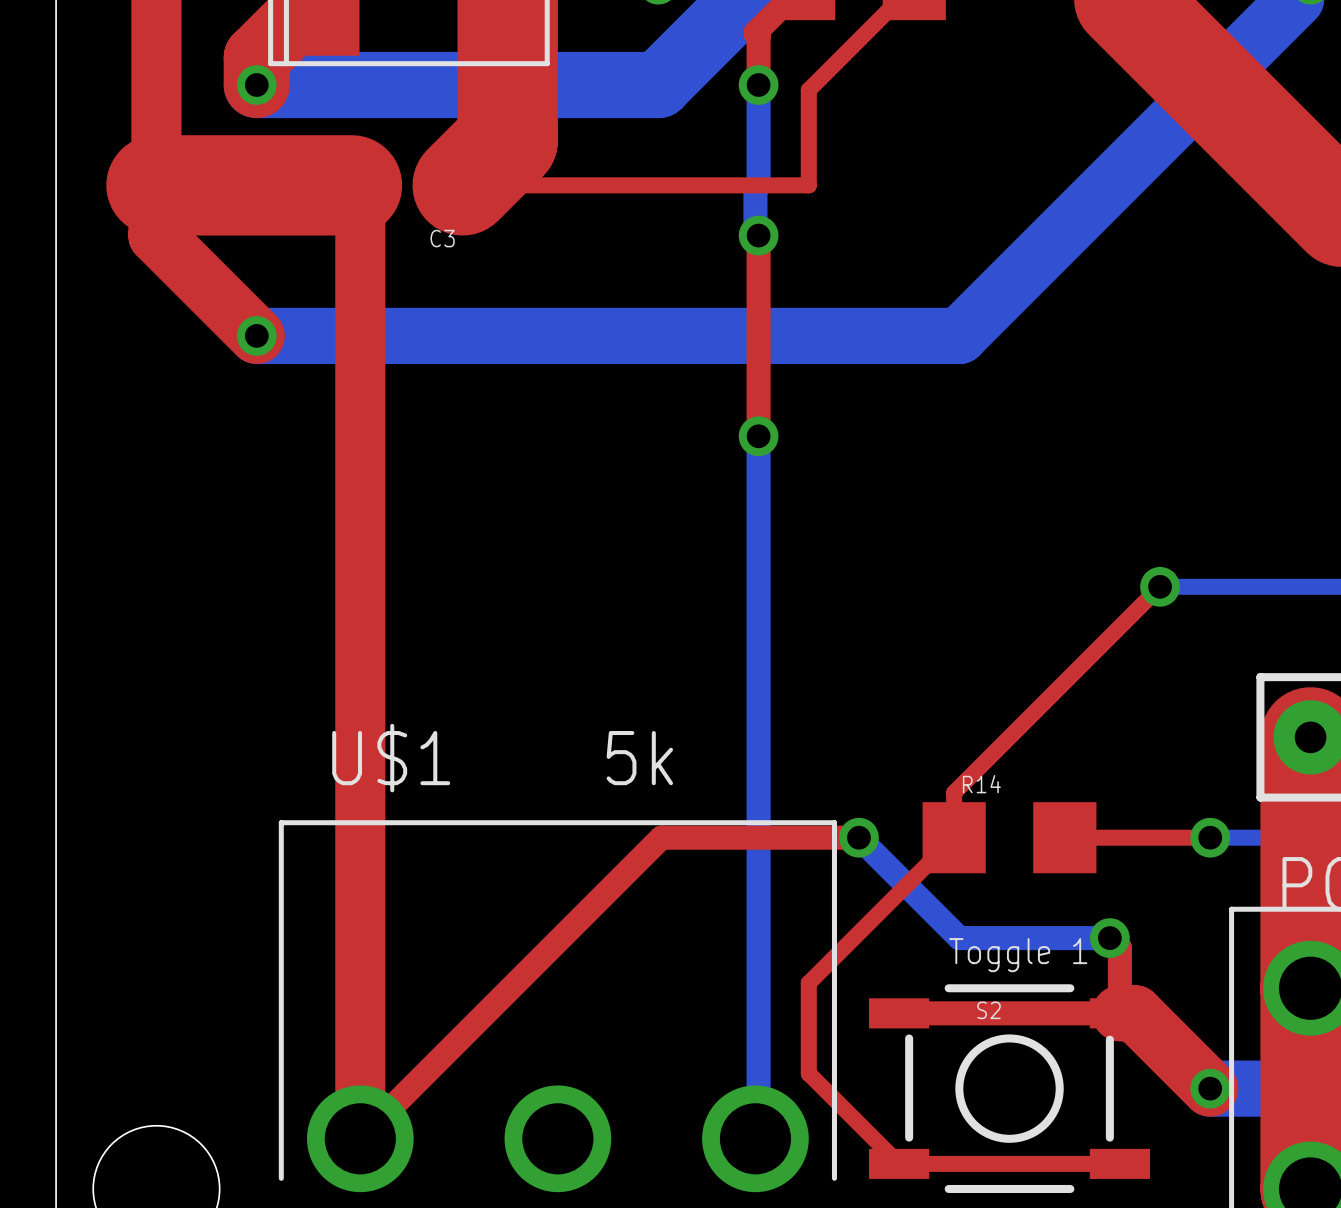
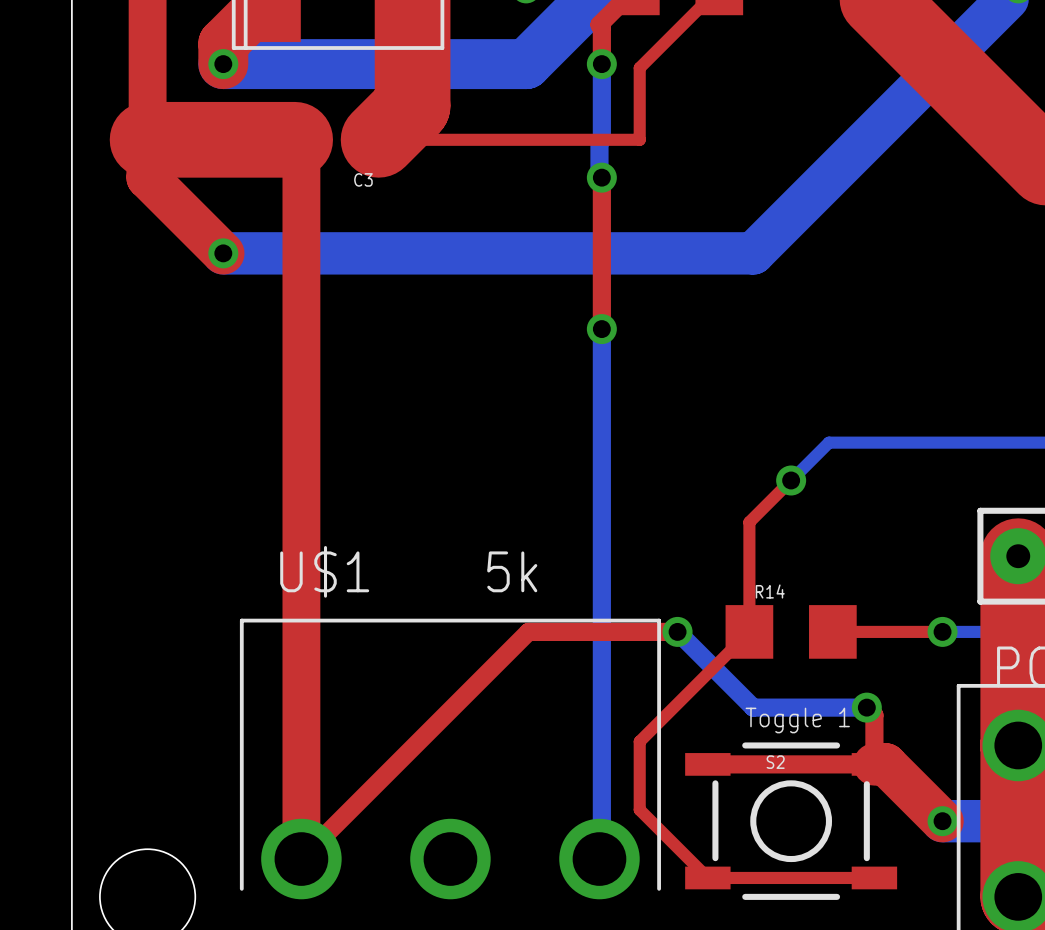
bottom track: none -> (904, 442) (828, 442) (791, 480)
top track: (1160, 586) (954, 792) -> (791, 480) (749, 522) (749, 597)
via position: (1160, 586) -> (791, 480)

